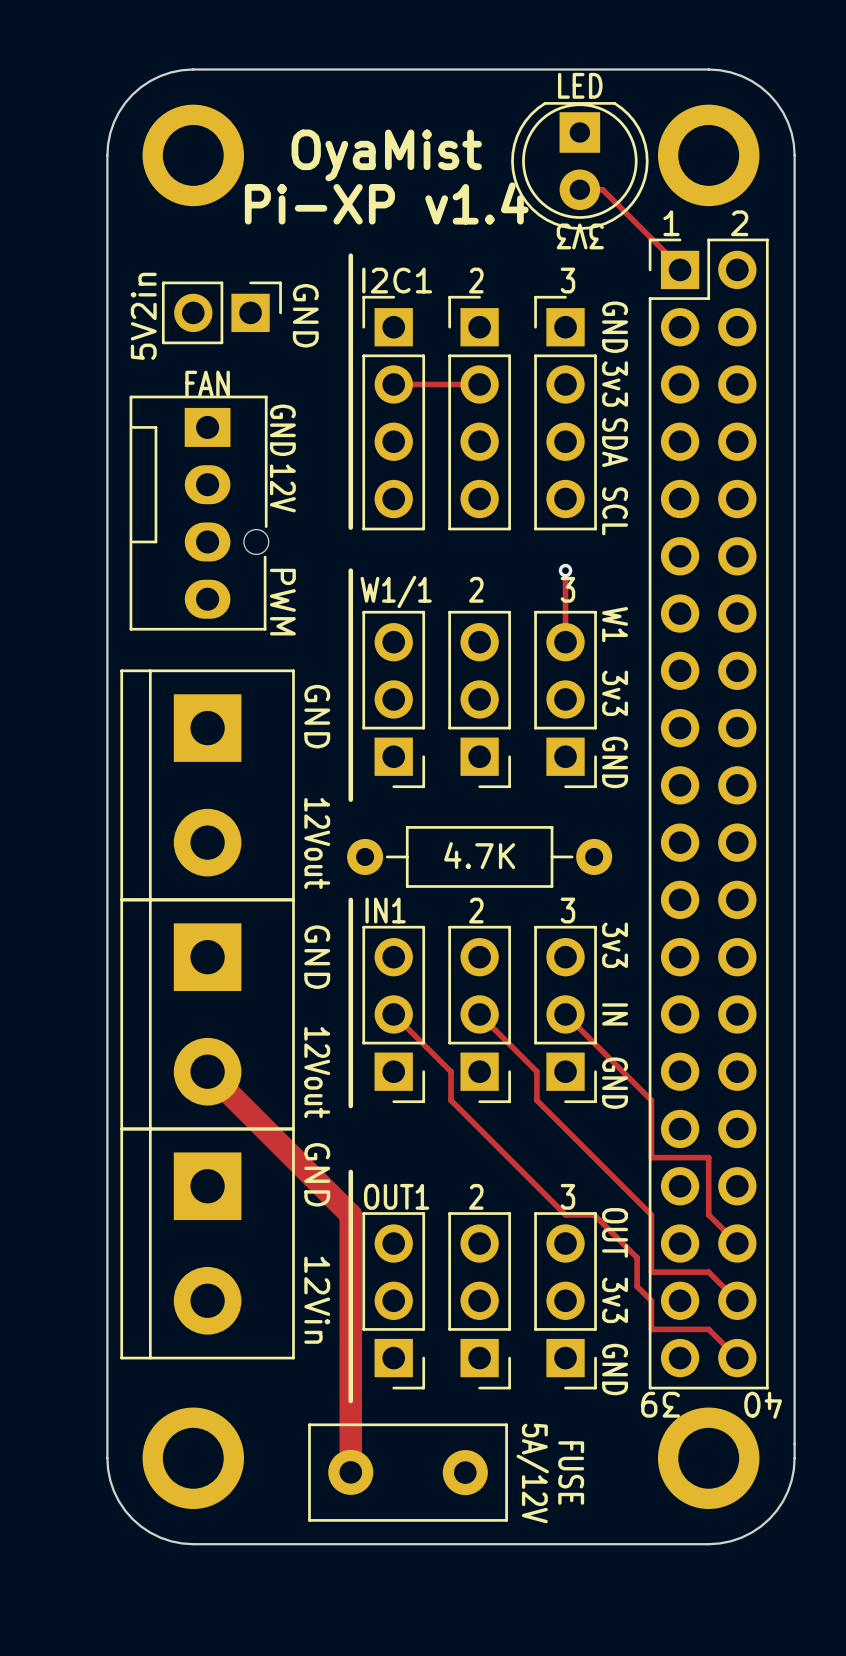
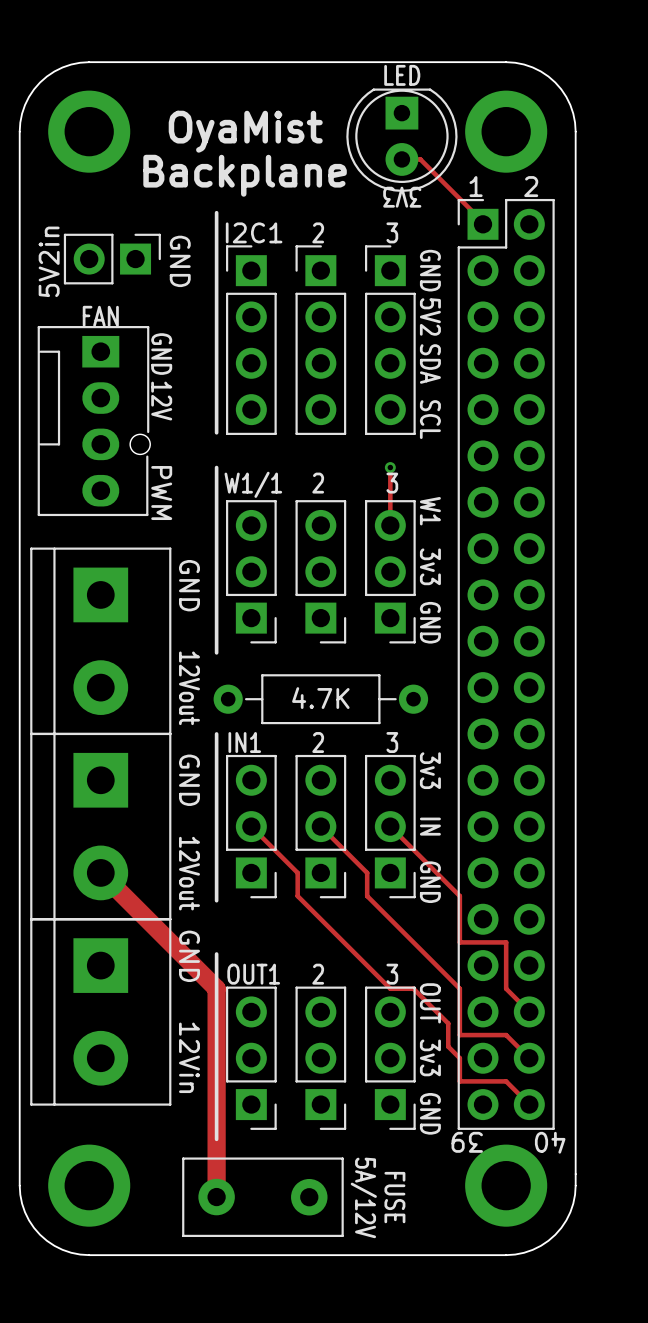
text: Pi-XP v1.4 (386, 203) -> Backplane (245, 175)
track: (393, 384) (479, 384) -> none
text: 3v3 (615, 384) -> 5V2 (430, 316)

